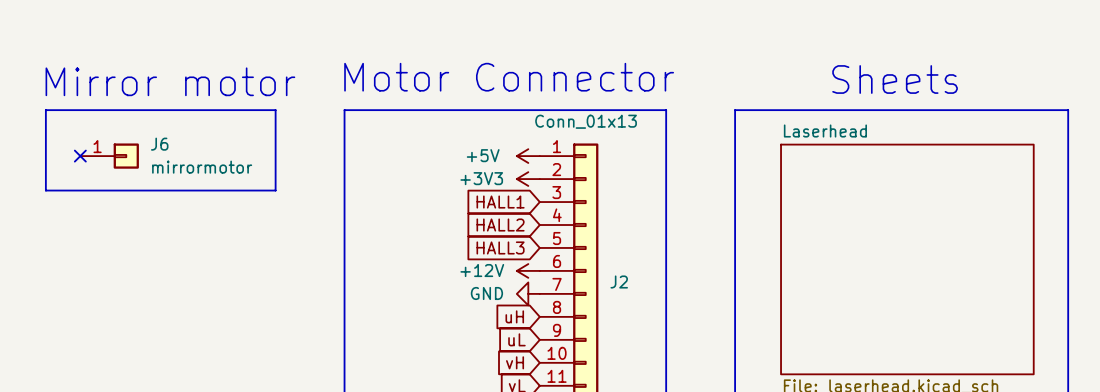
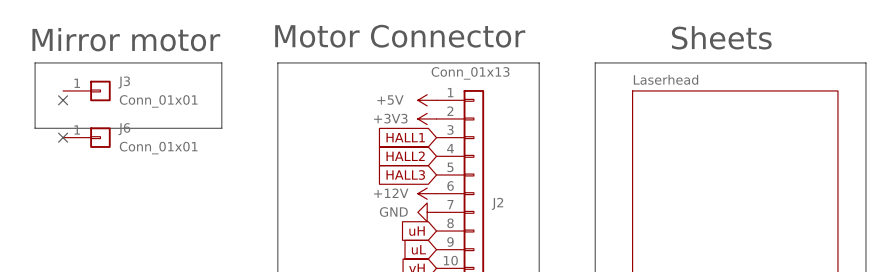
J3: none -> Conn_01x01 (86, 90)
J6 position: (109, 156) -> (86, 137)
J6 value: mirrormotor (202, 167) -> Conn_01x01 (158, 148)
no-connect mark: none -> (63, 137)

